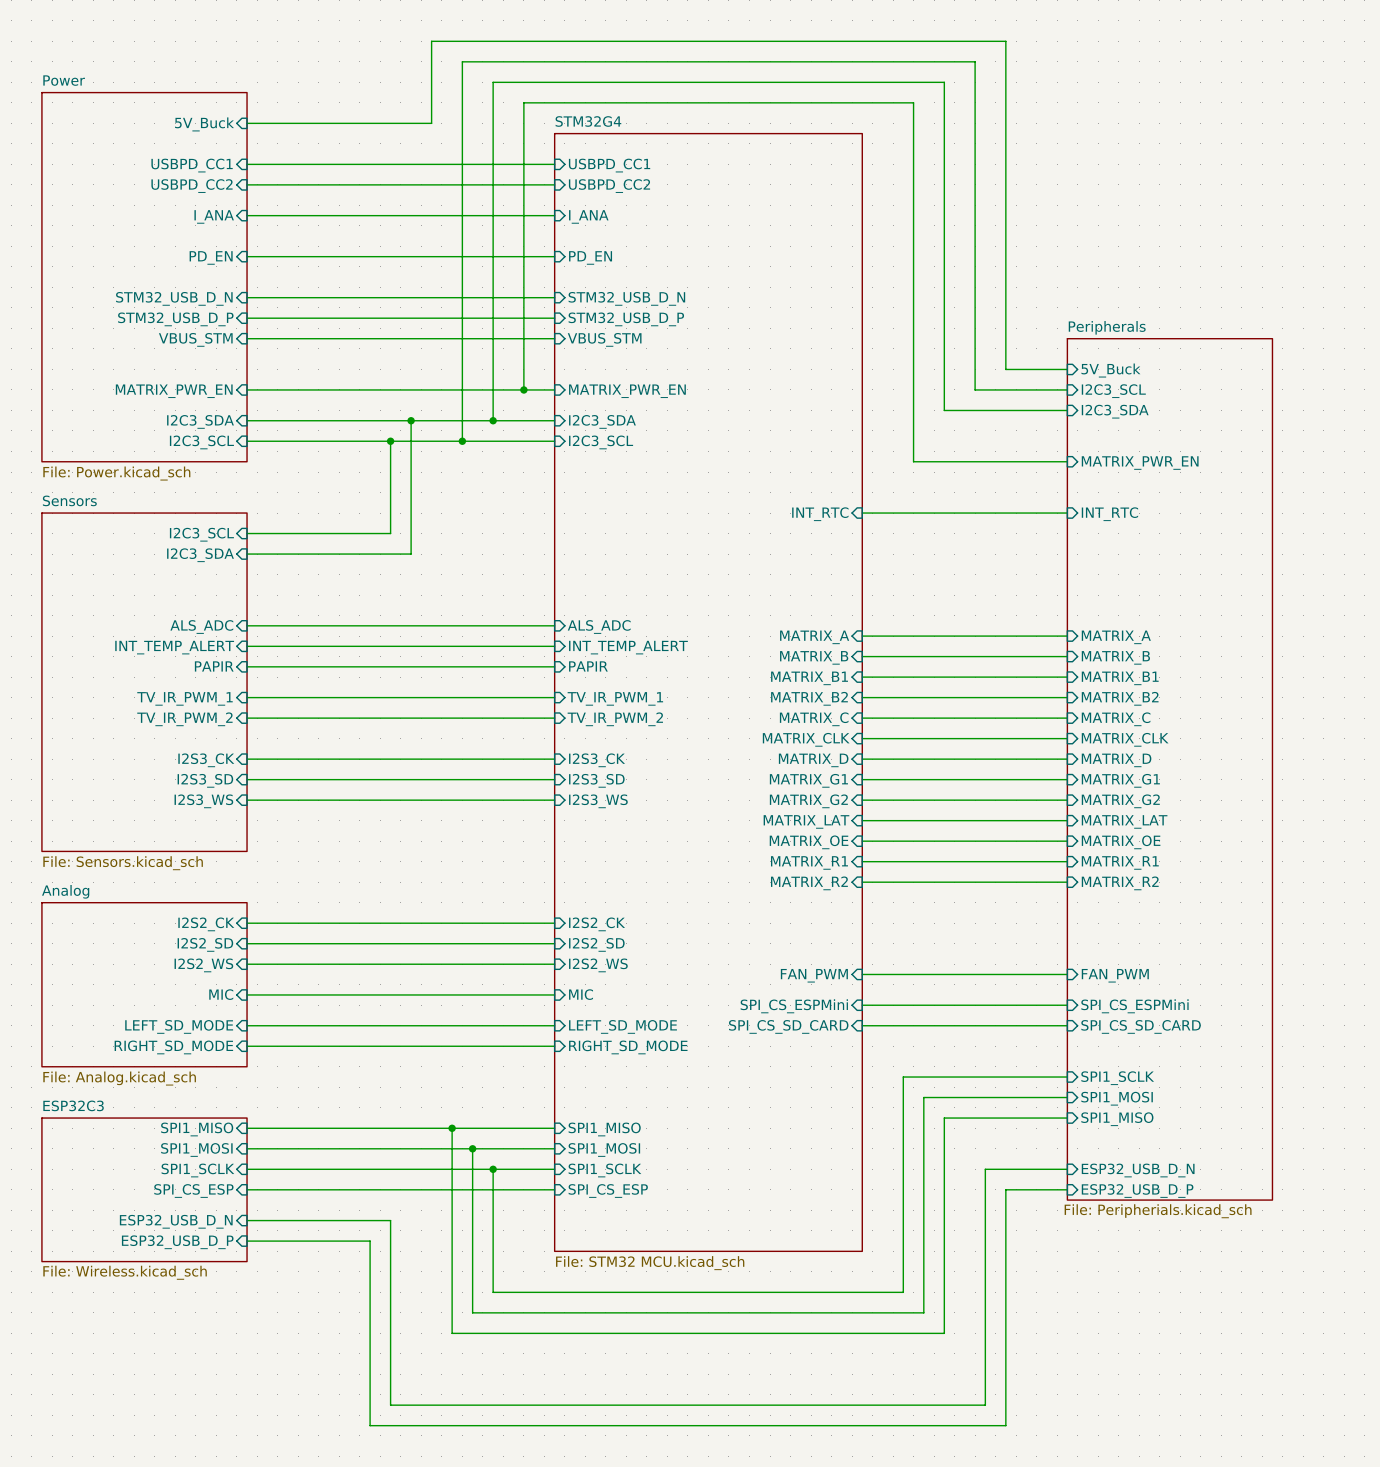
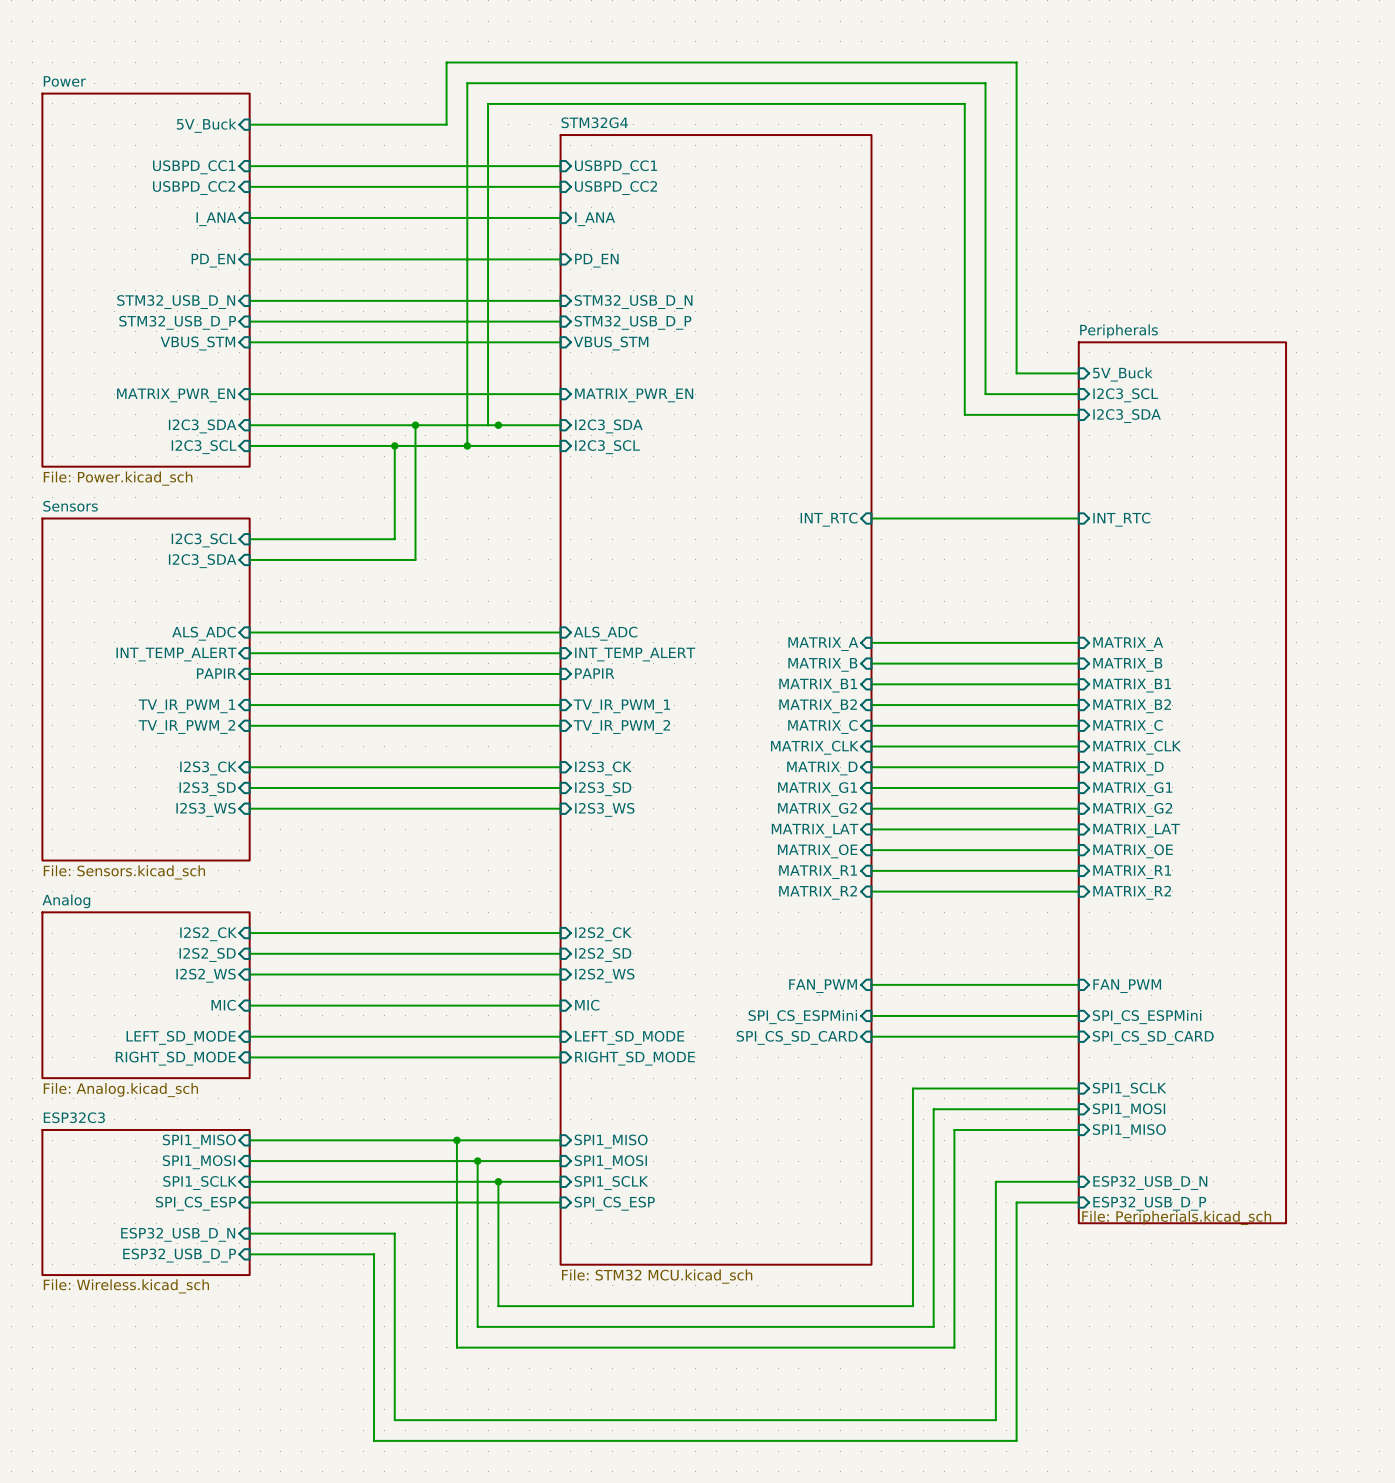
wire: (462, 61) (462, 82) -> (498, 83) (467, 83)
wire: (975, 61) (975, 82) -> (985, 62) (1016, 62)
wire: (1005, 61) (1005, 41) (431, 41) (431, 123) -> (467, 62) (446, 62) (446, 124) (436, 124)
wire: (493, 82) (493, 420) -> none
wire: (944, 82) (944, 410) (954, 410) -> (923, 103) (964, 103) (964, 414)
wire: none -> (954, 83) (985, 83)
wire: (523, 102) (523, 389) -> (529, 103) (488, 103) (488, 425)
wire: (913, 102) (913, 461) (1067, 461) -> none
sheet Peripherals shape: [1066, 338, 1274, 1201] -> [1078, 341, 1287, 1224]
junction: (523, 389) -> none
sheet pin: MATRIX_PWR_EN (1140, 463) -> none

